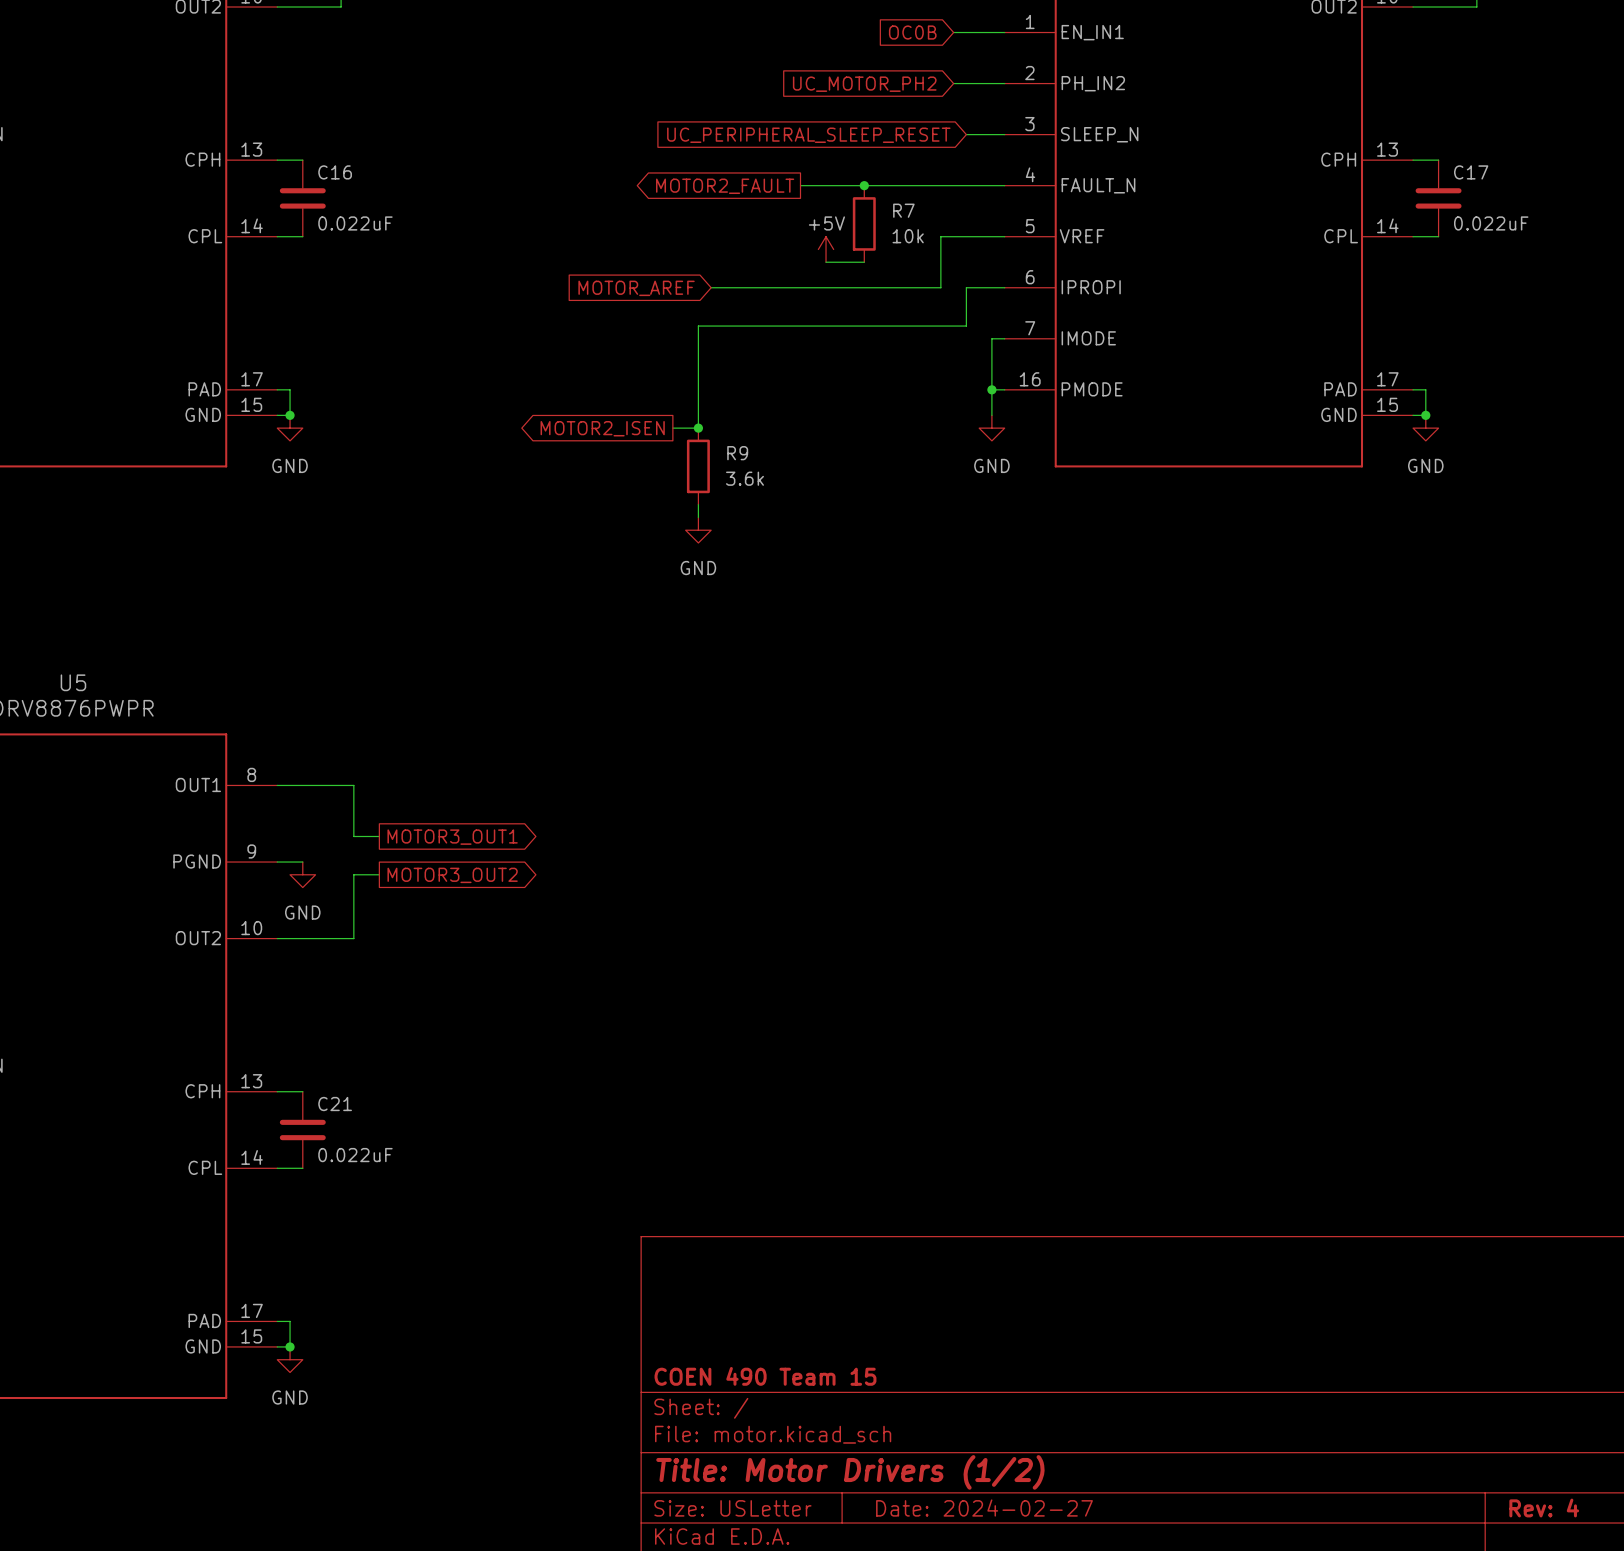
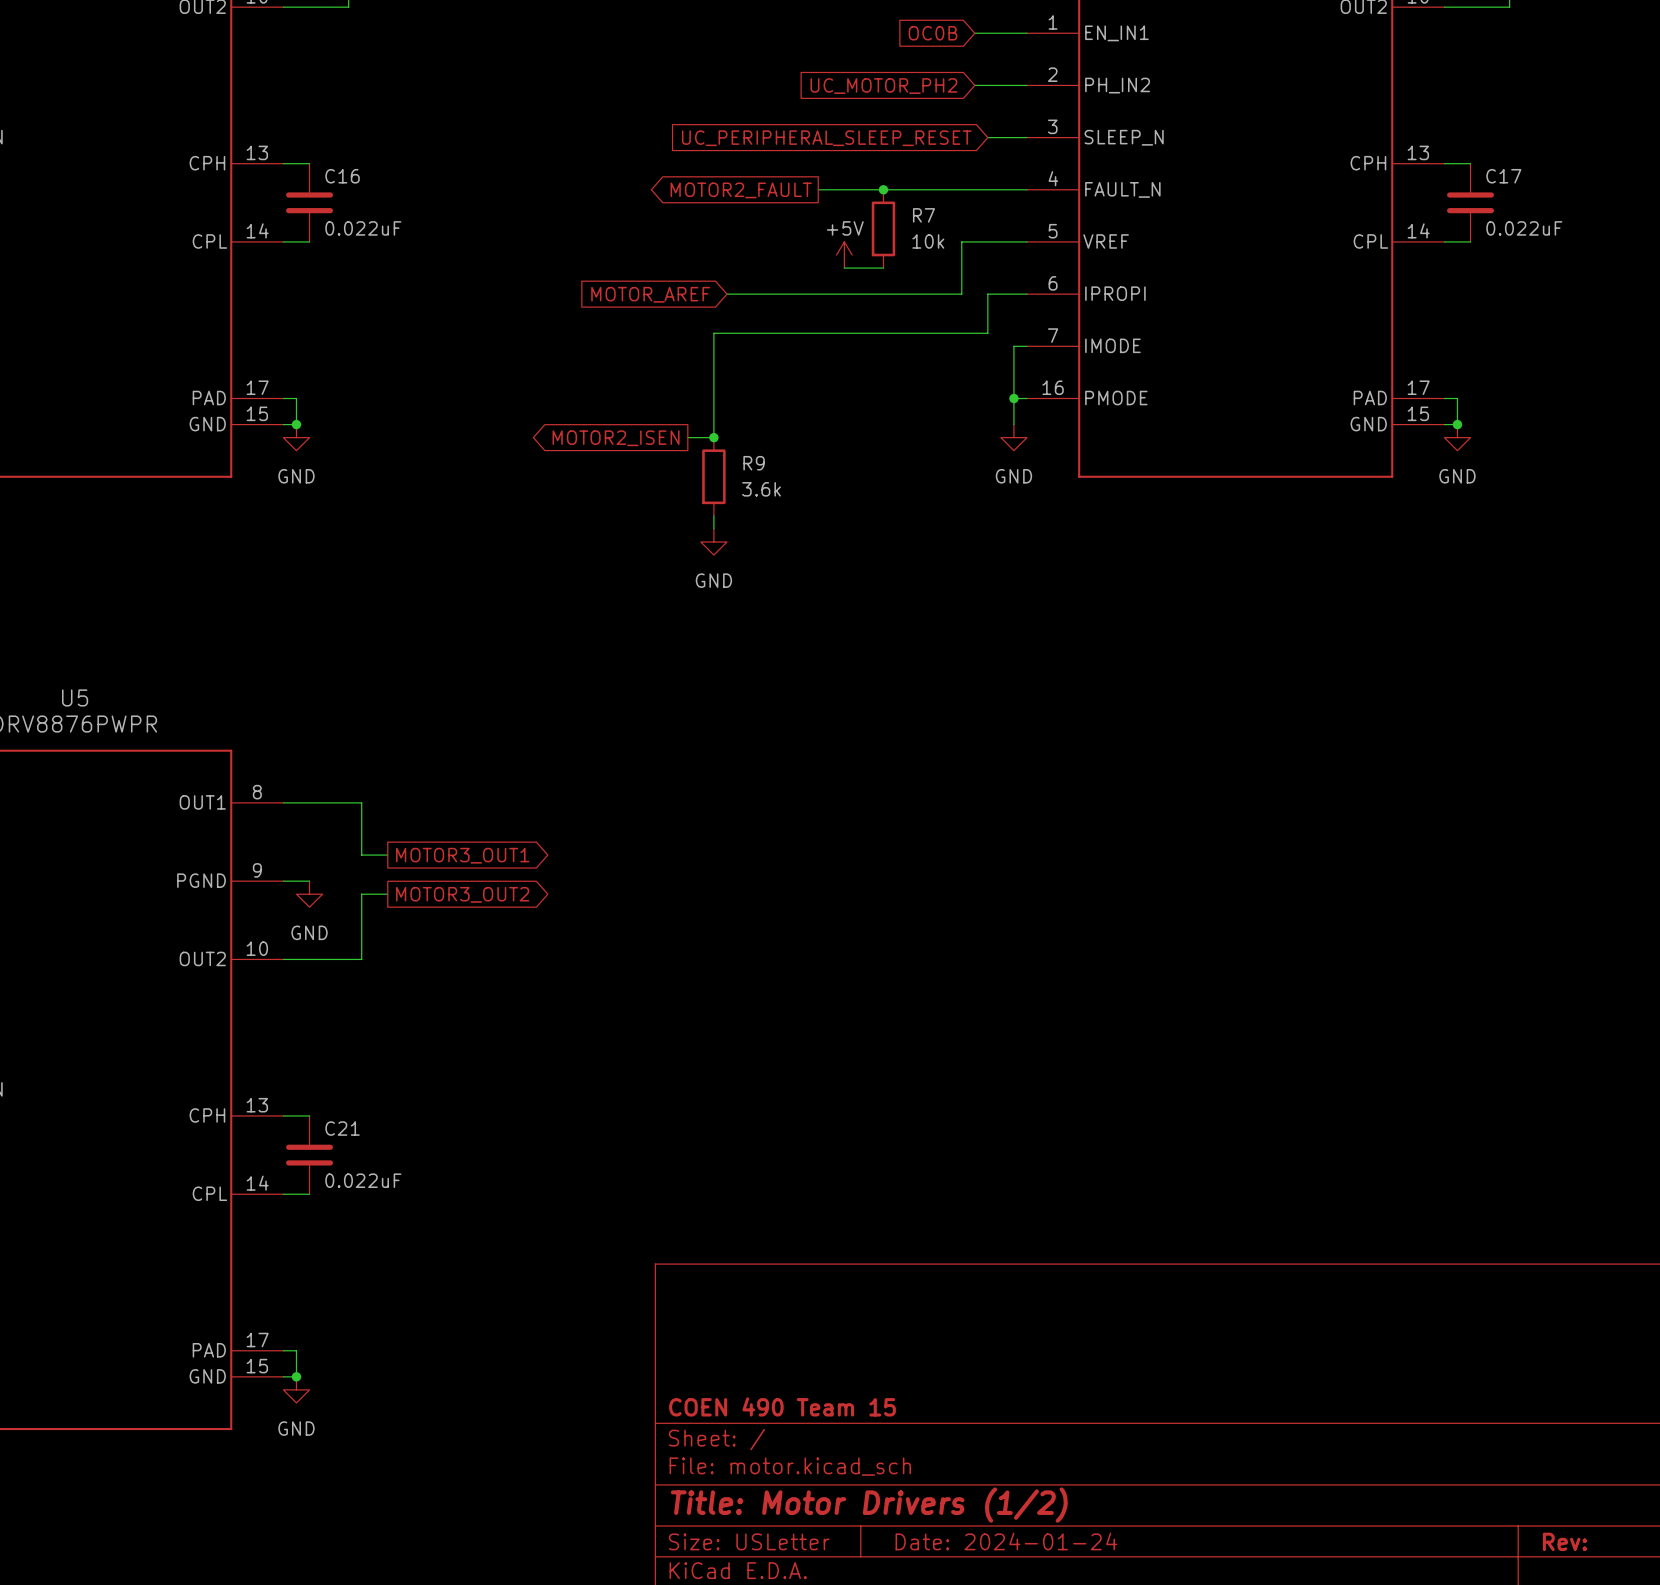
title block: Date: 2024-02-27 (984, 1508) -> Date: 2024-01-24 (1006, 1541)
title block: Rev: 4 (1544, 1508) -> Rev: (1564, 1541)

